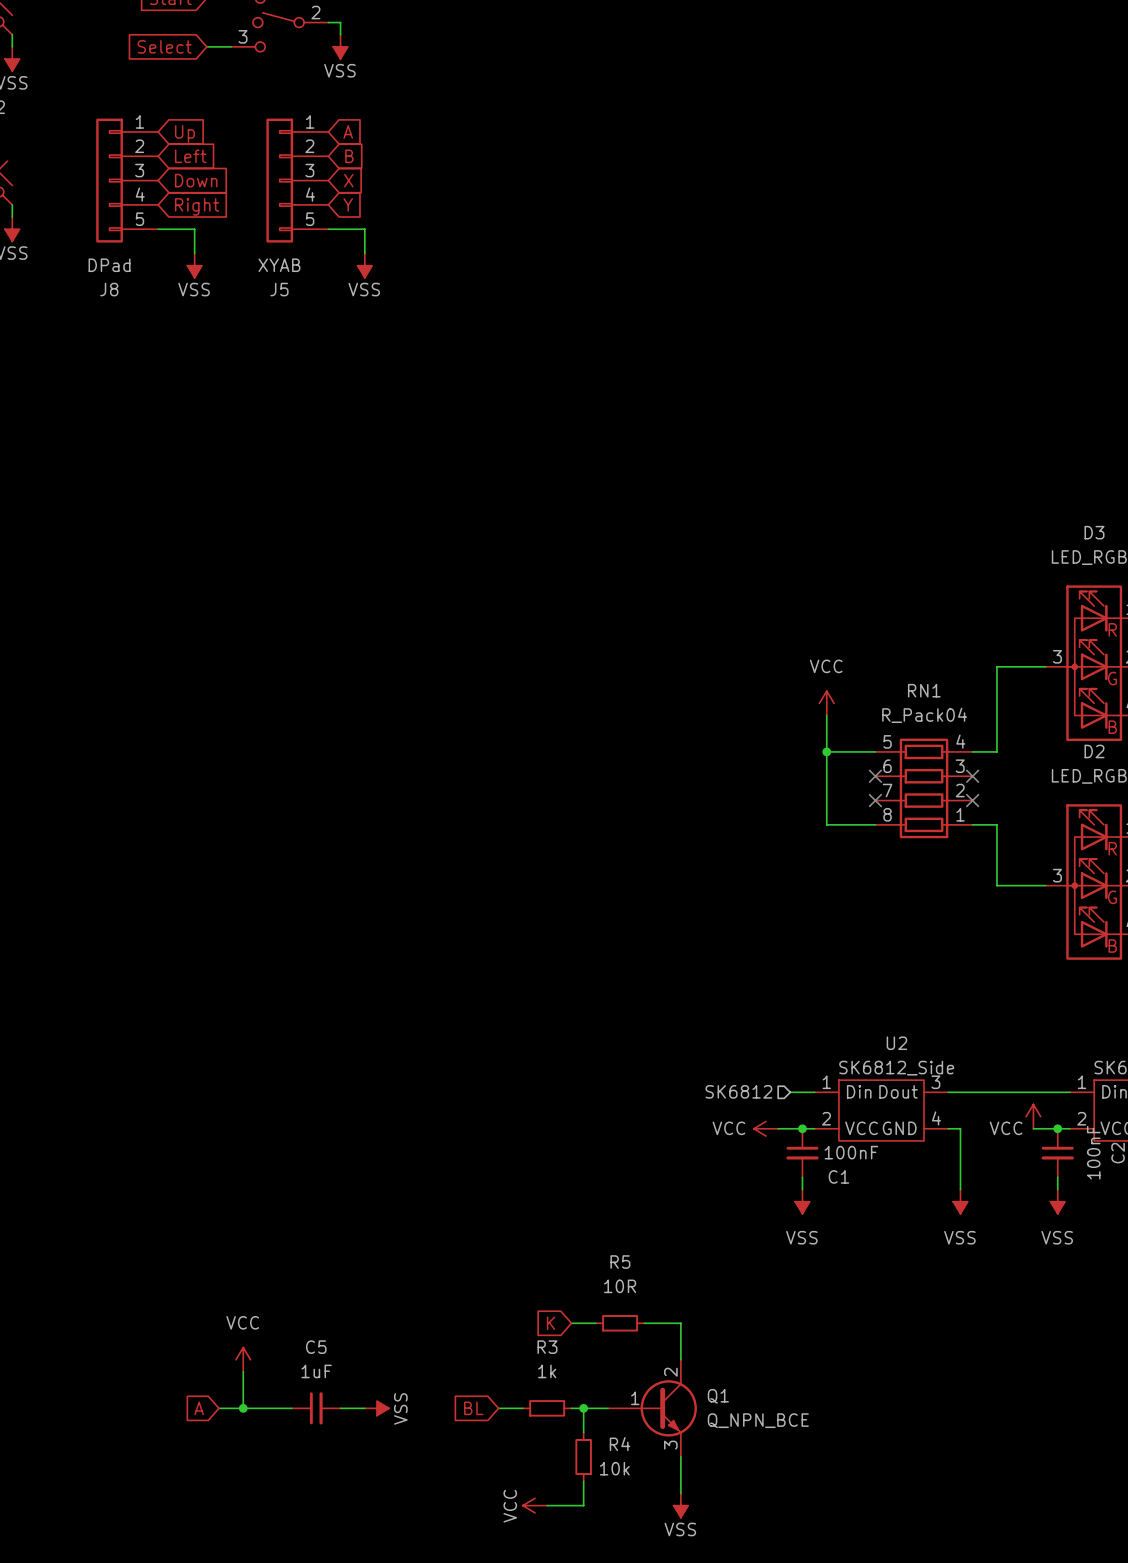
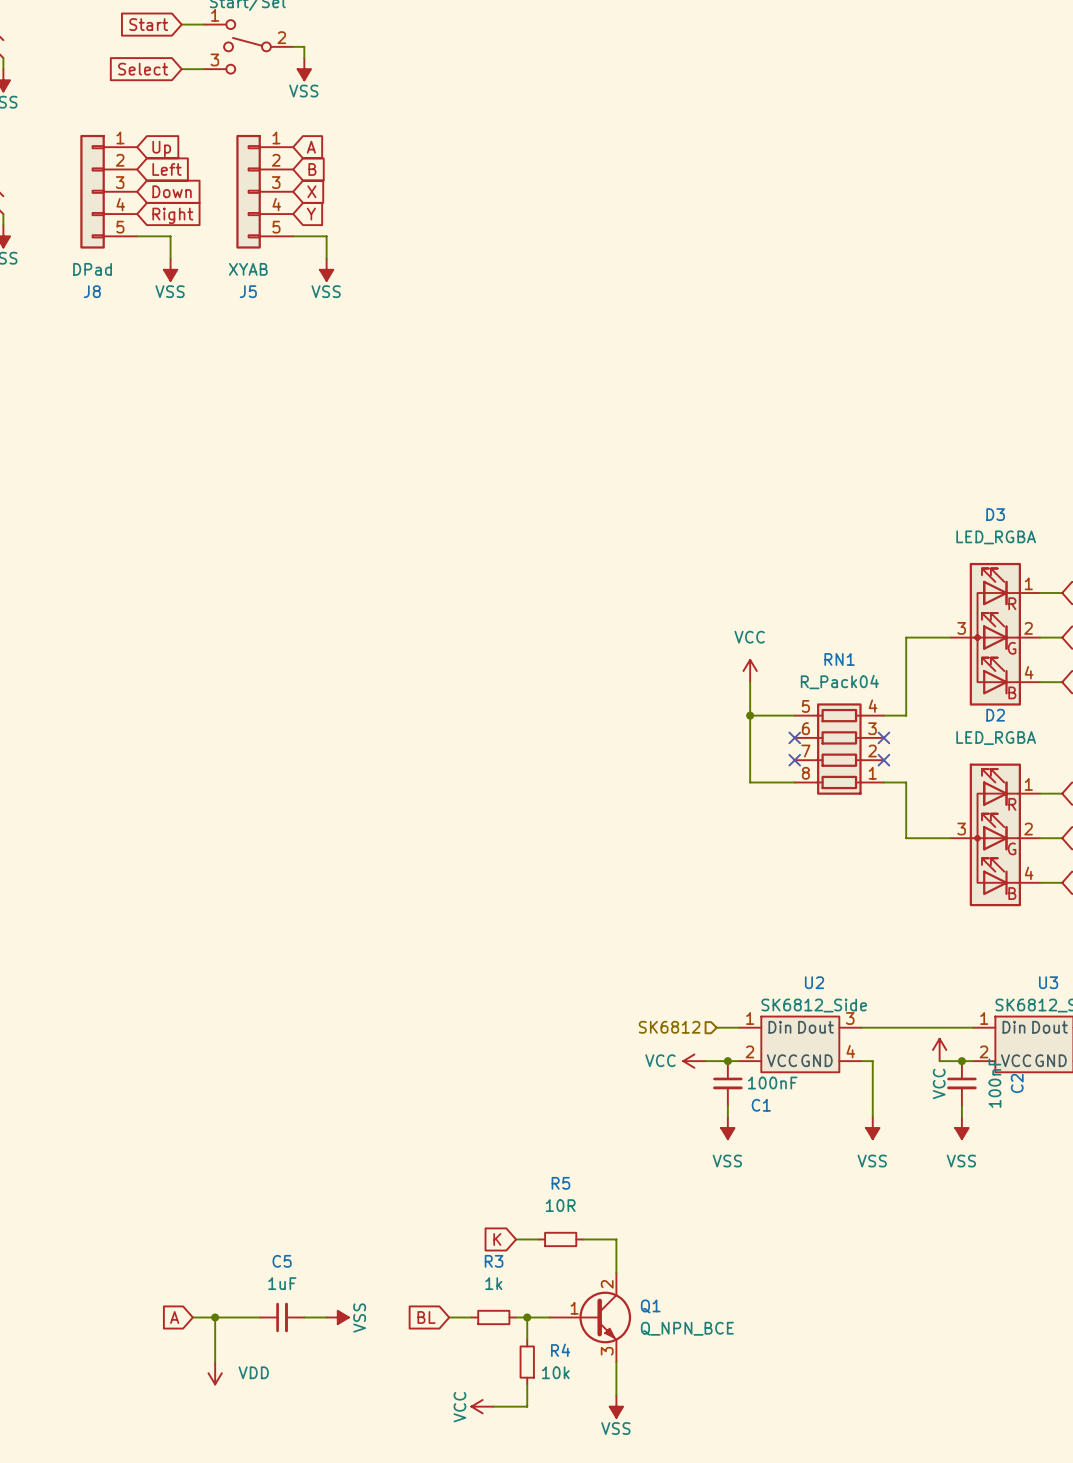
power symbol text rotation: 0° (1006, 1128) -> 90° counterclockwise (939, 1083)
power symbol: VCC (243, 1359) -> none
wire: (243, 1371) (243, 1408) -> (215, 1362) (215, 1317)
power symbol: none -> VDD (215, 1373)

